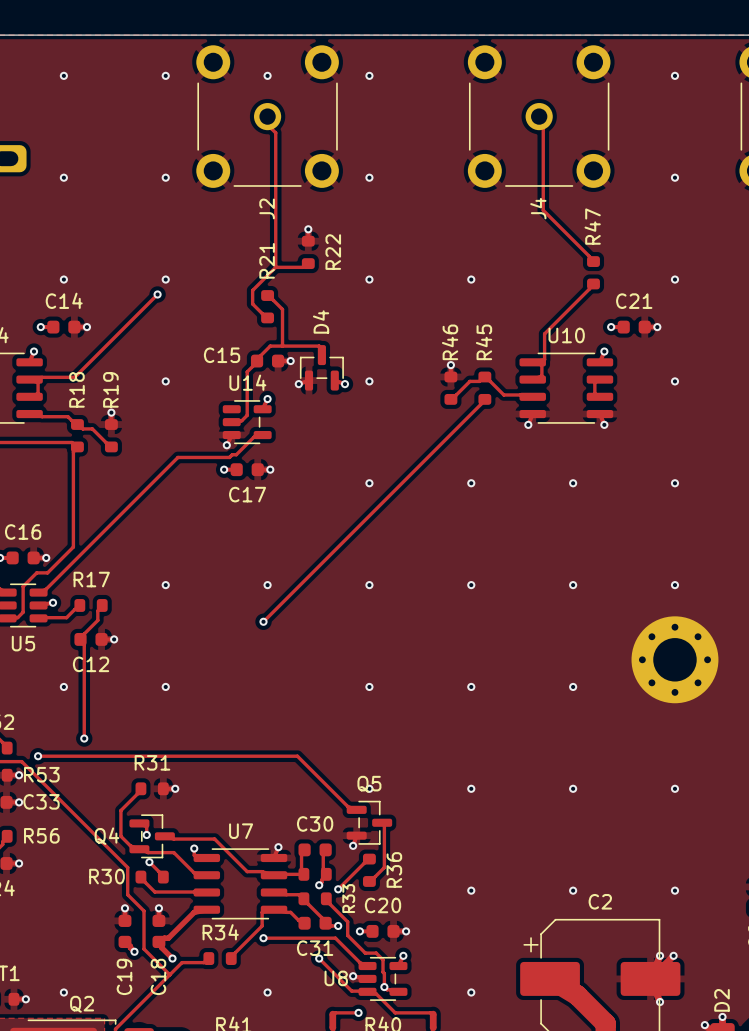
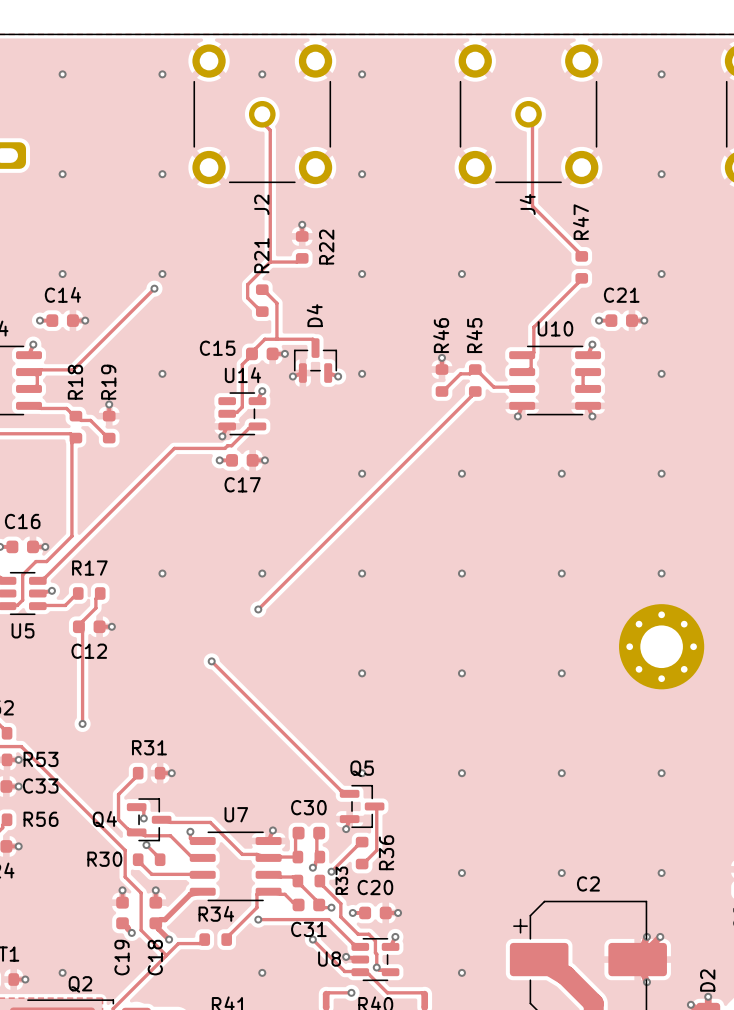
via: (63, 686) -> none
via position: (165, 686) -> (211, 661)
track: (38, 756) (297, 756) -> (211, 661) (291, 741)
via: (38, 756) -> none

